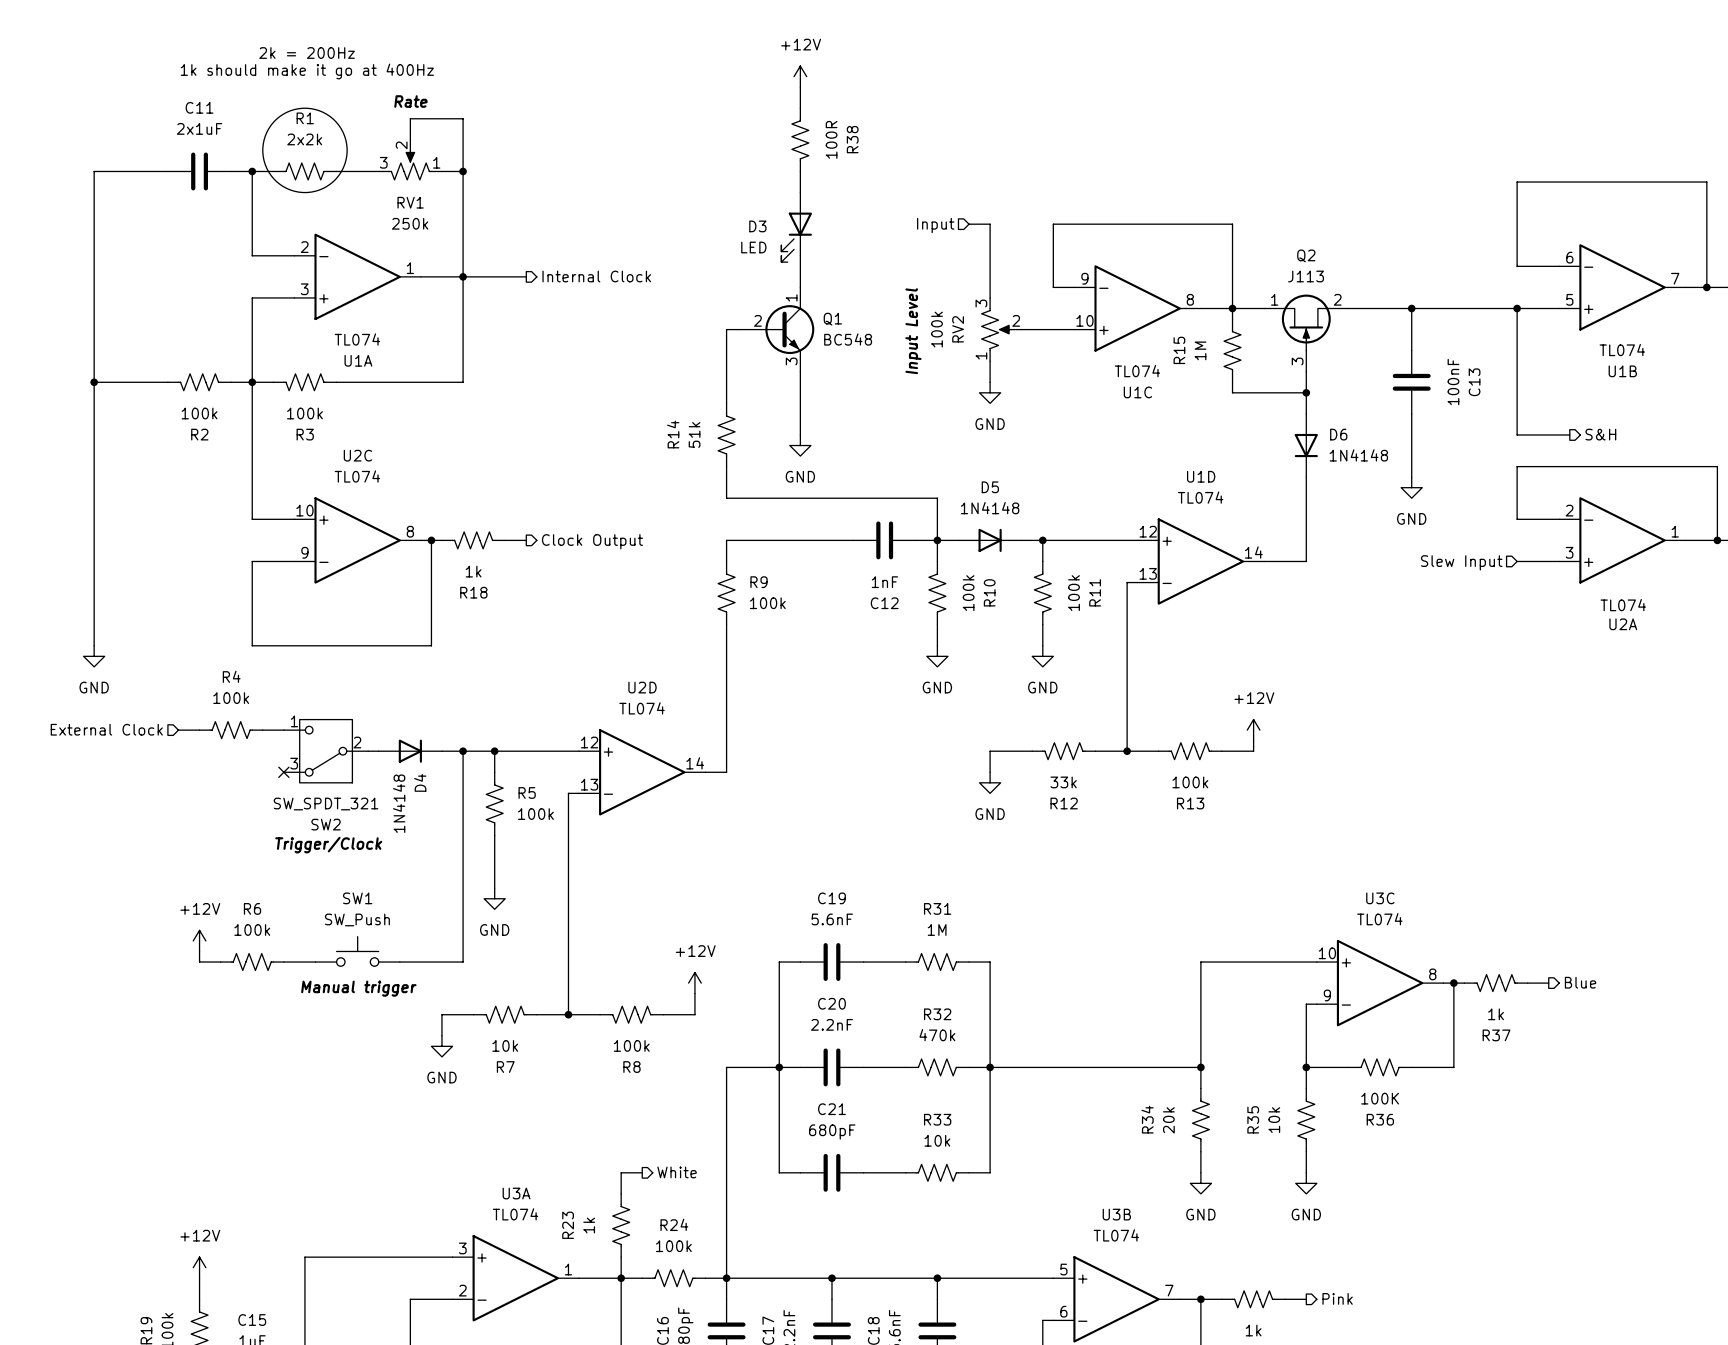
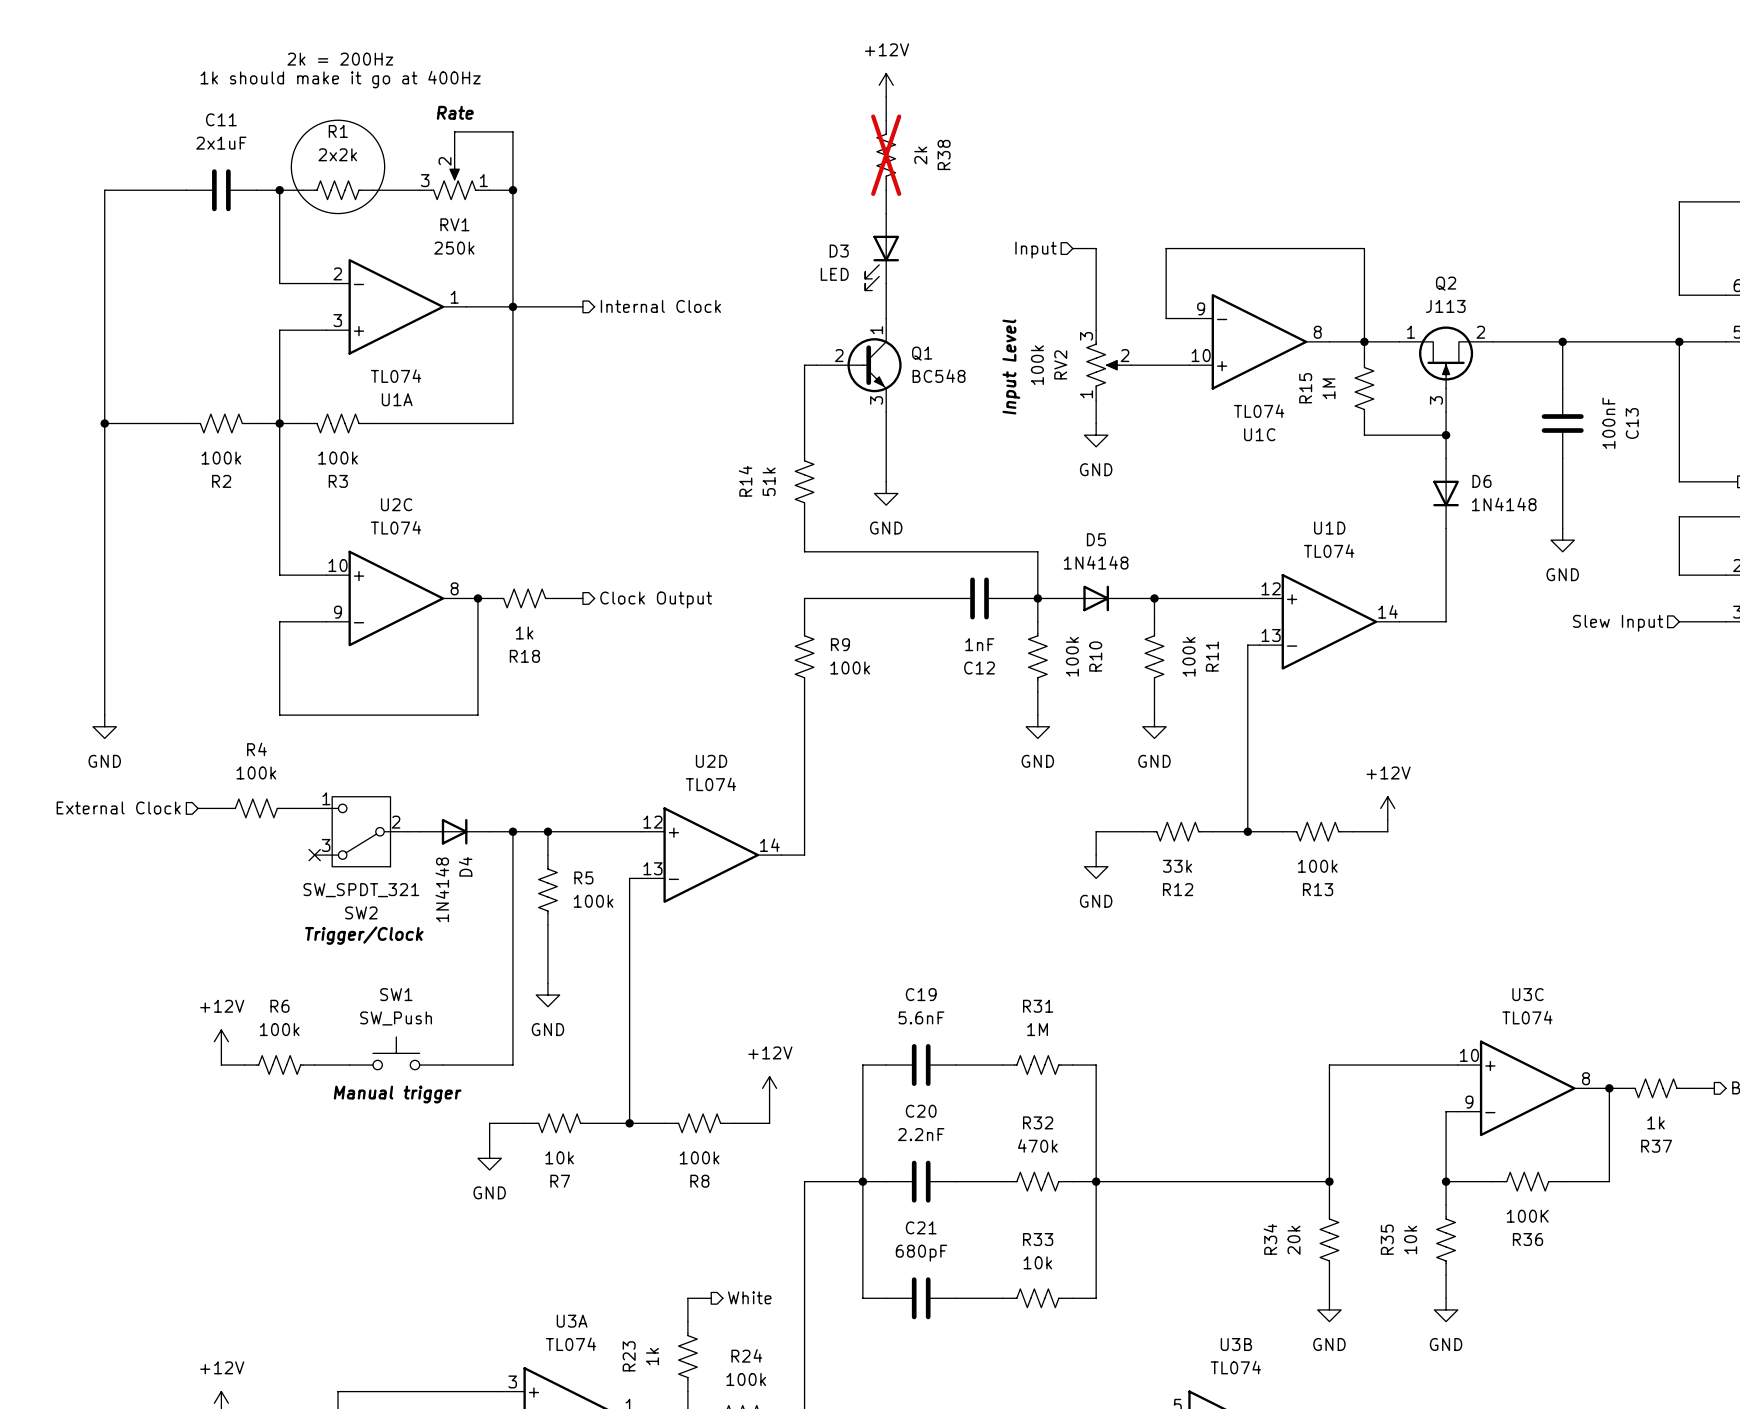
R38 do-not-place cross: none -> (886, 155)
R38 value: 100R (831, 139) -> 2k (920, 155)

